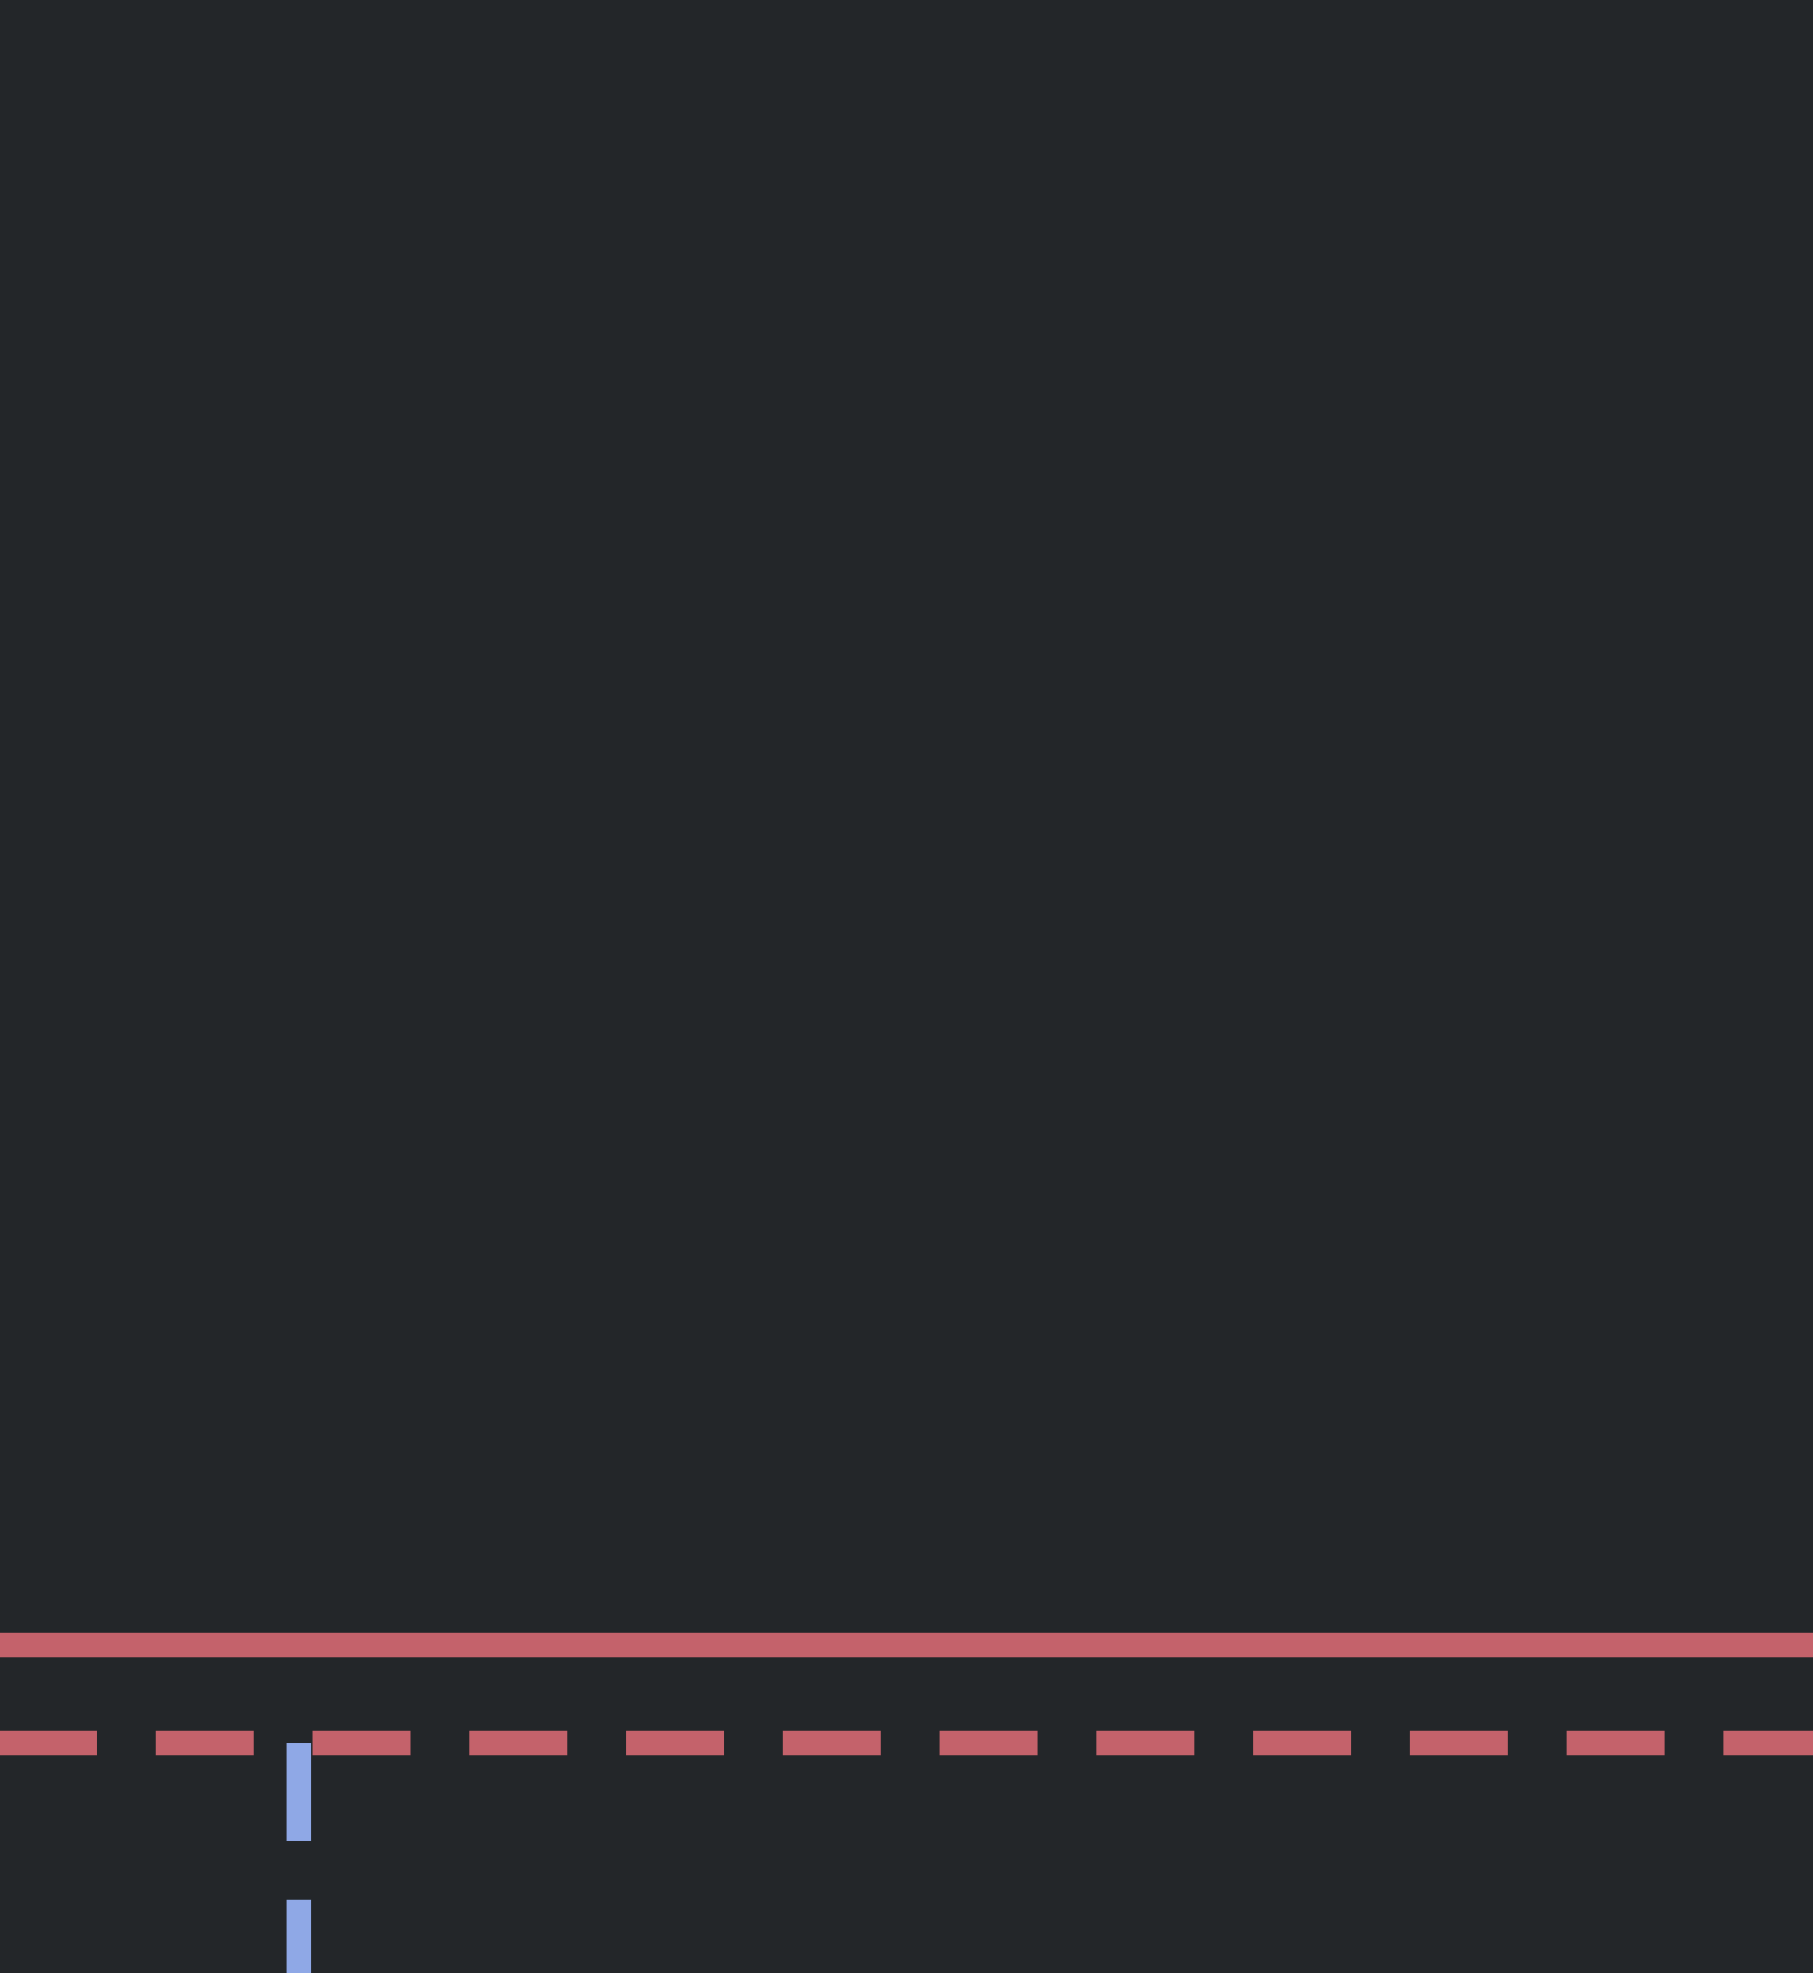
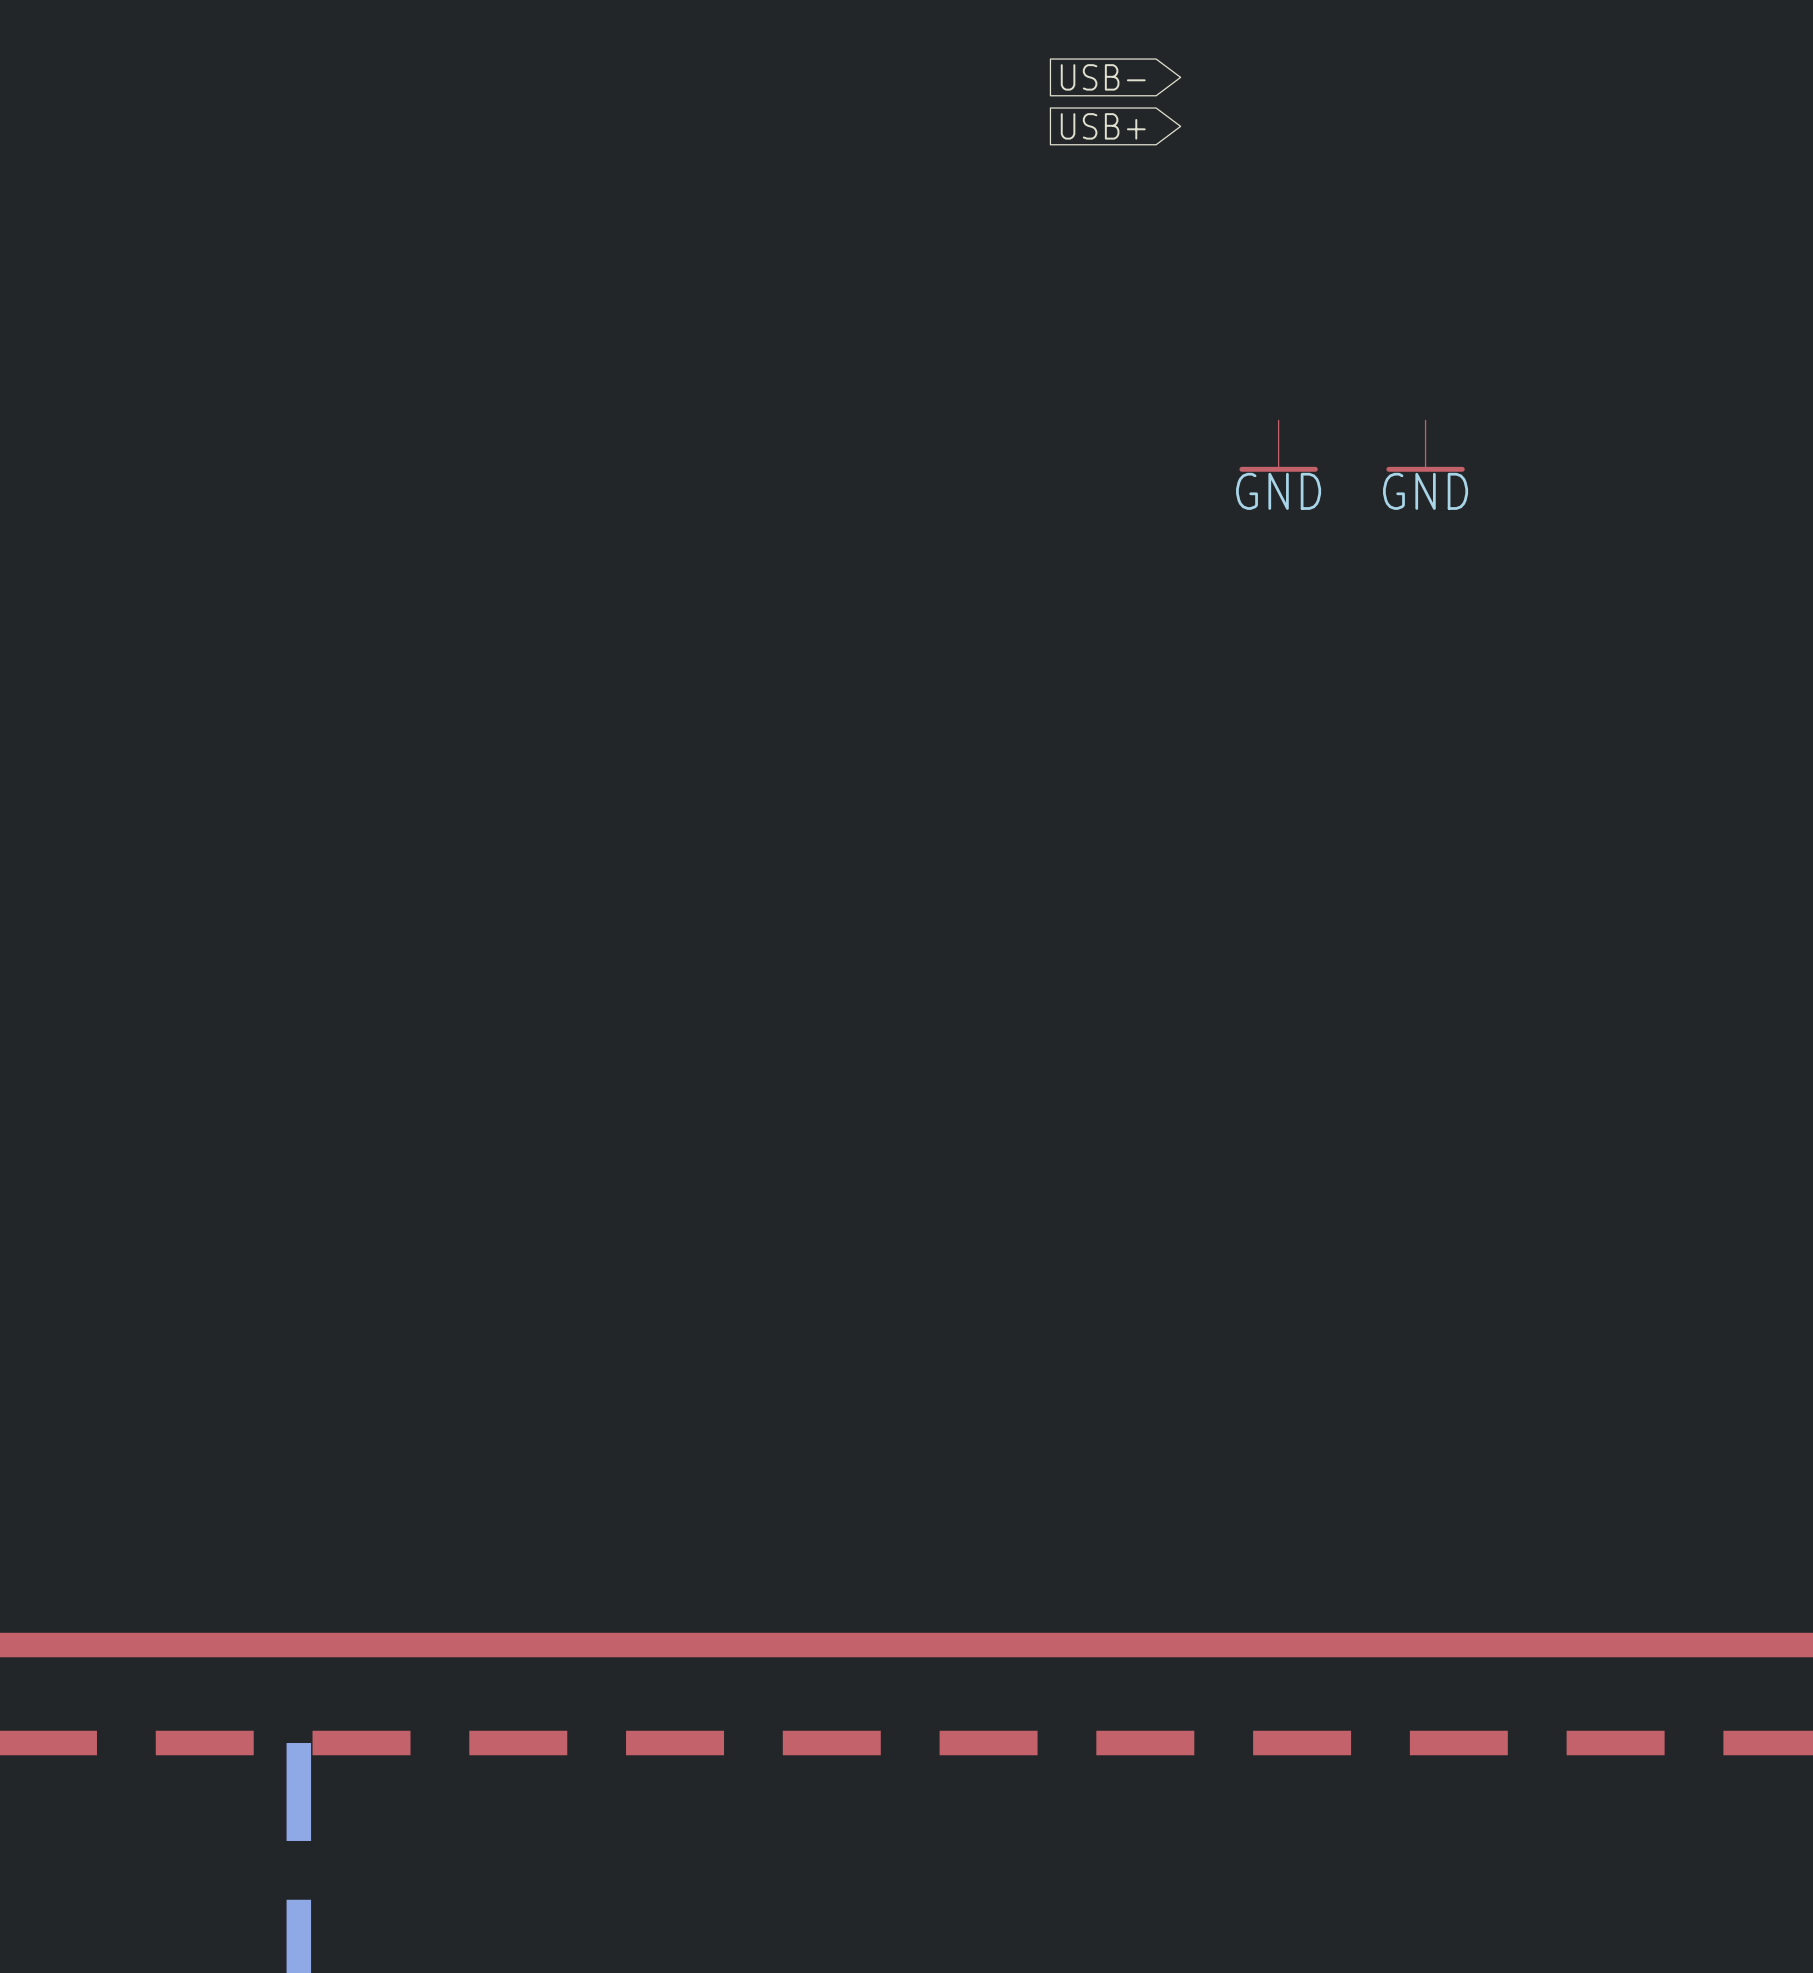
global label: none -> USB- (1103, 77)
global label: none -> USB+ (1103, 126)
power symbol: none -> GND (1278, 446)
power symbol: none -> GND (1425, 446)

